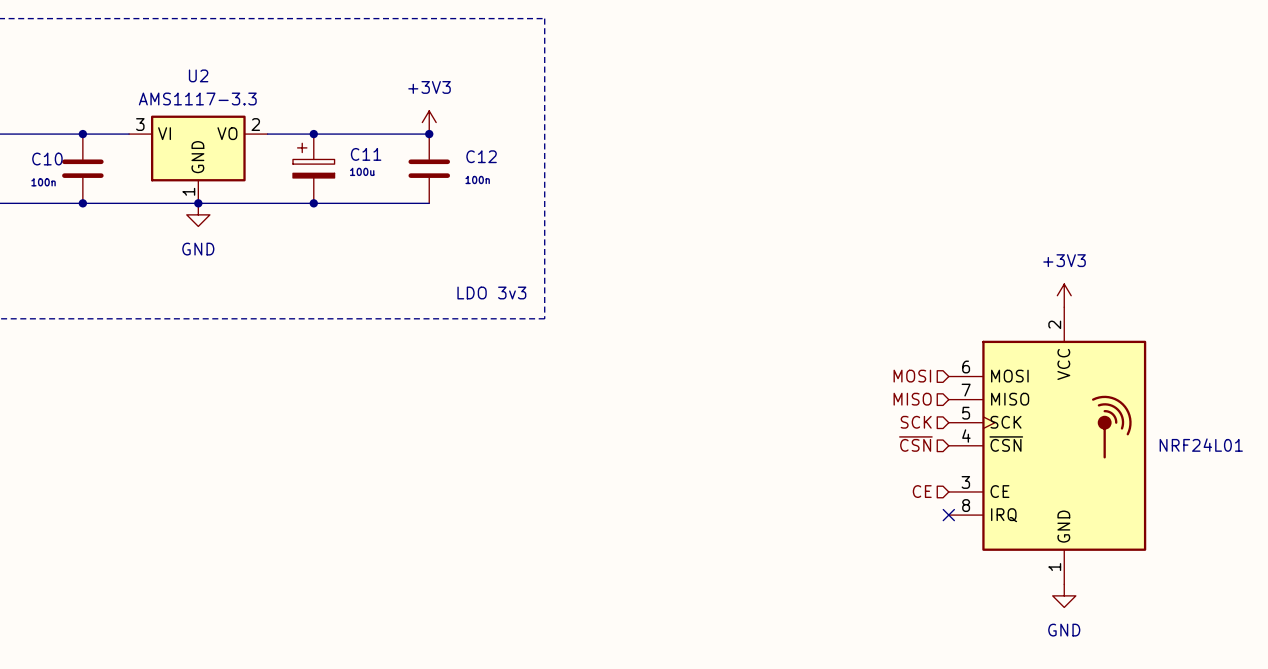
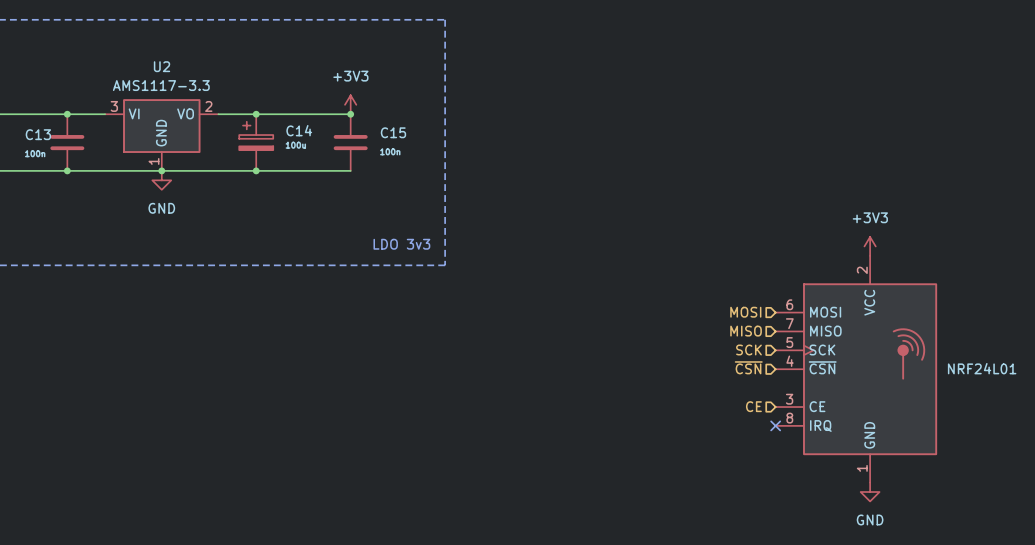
C11 name: C11 (366, 154) -> C14 (299, 130)
C12 name: C12 (481, 156) -> C15 (393, 132)
C10 name: C10 (47, 159) -> C13 (38, 134)

